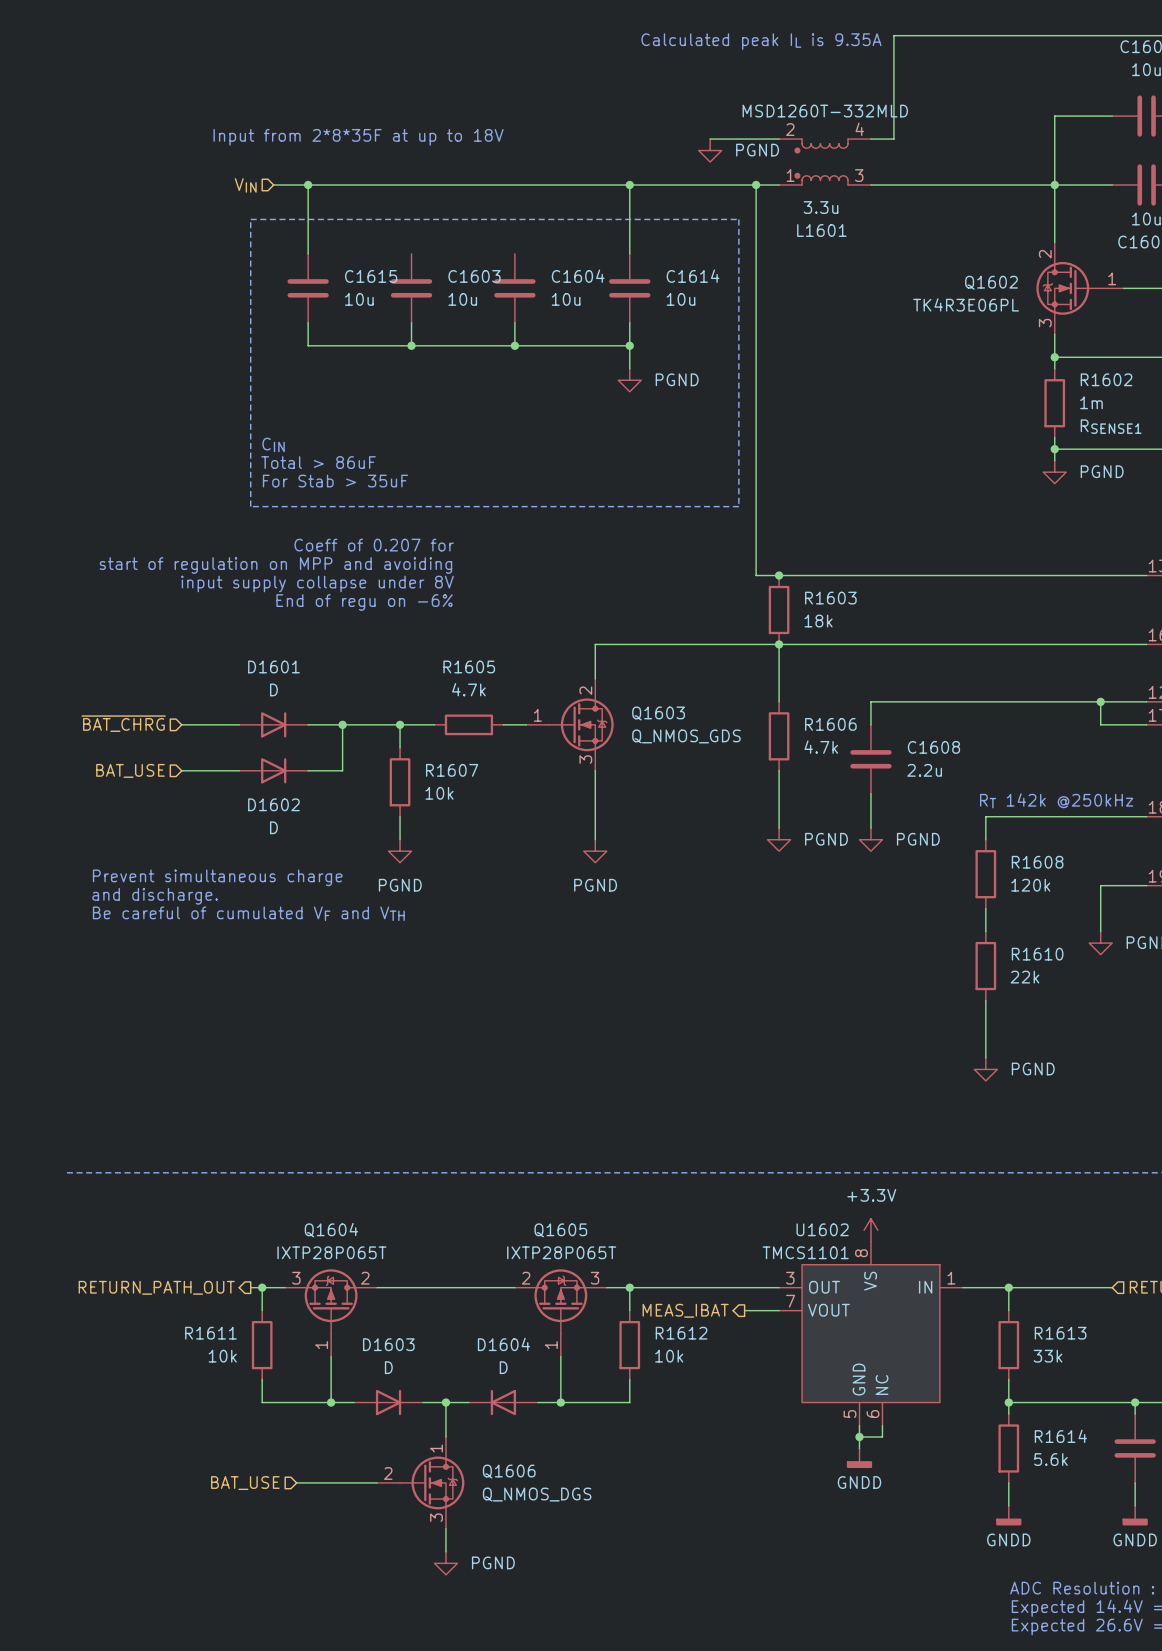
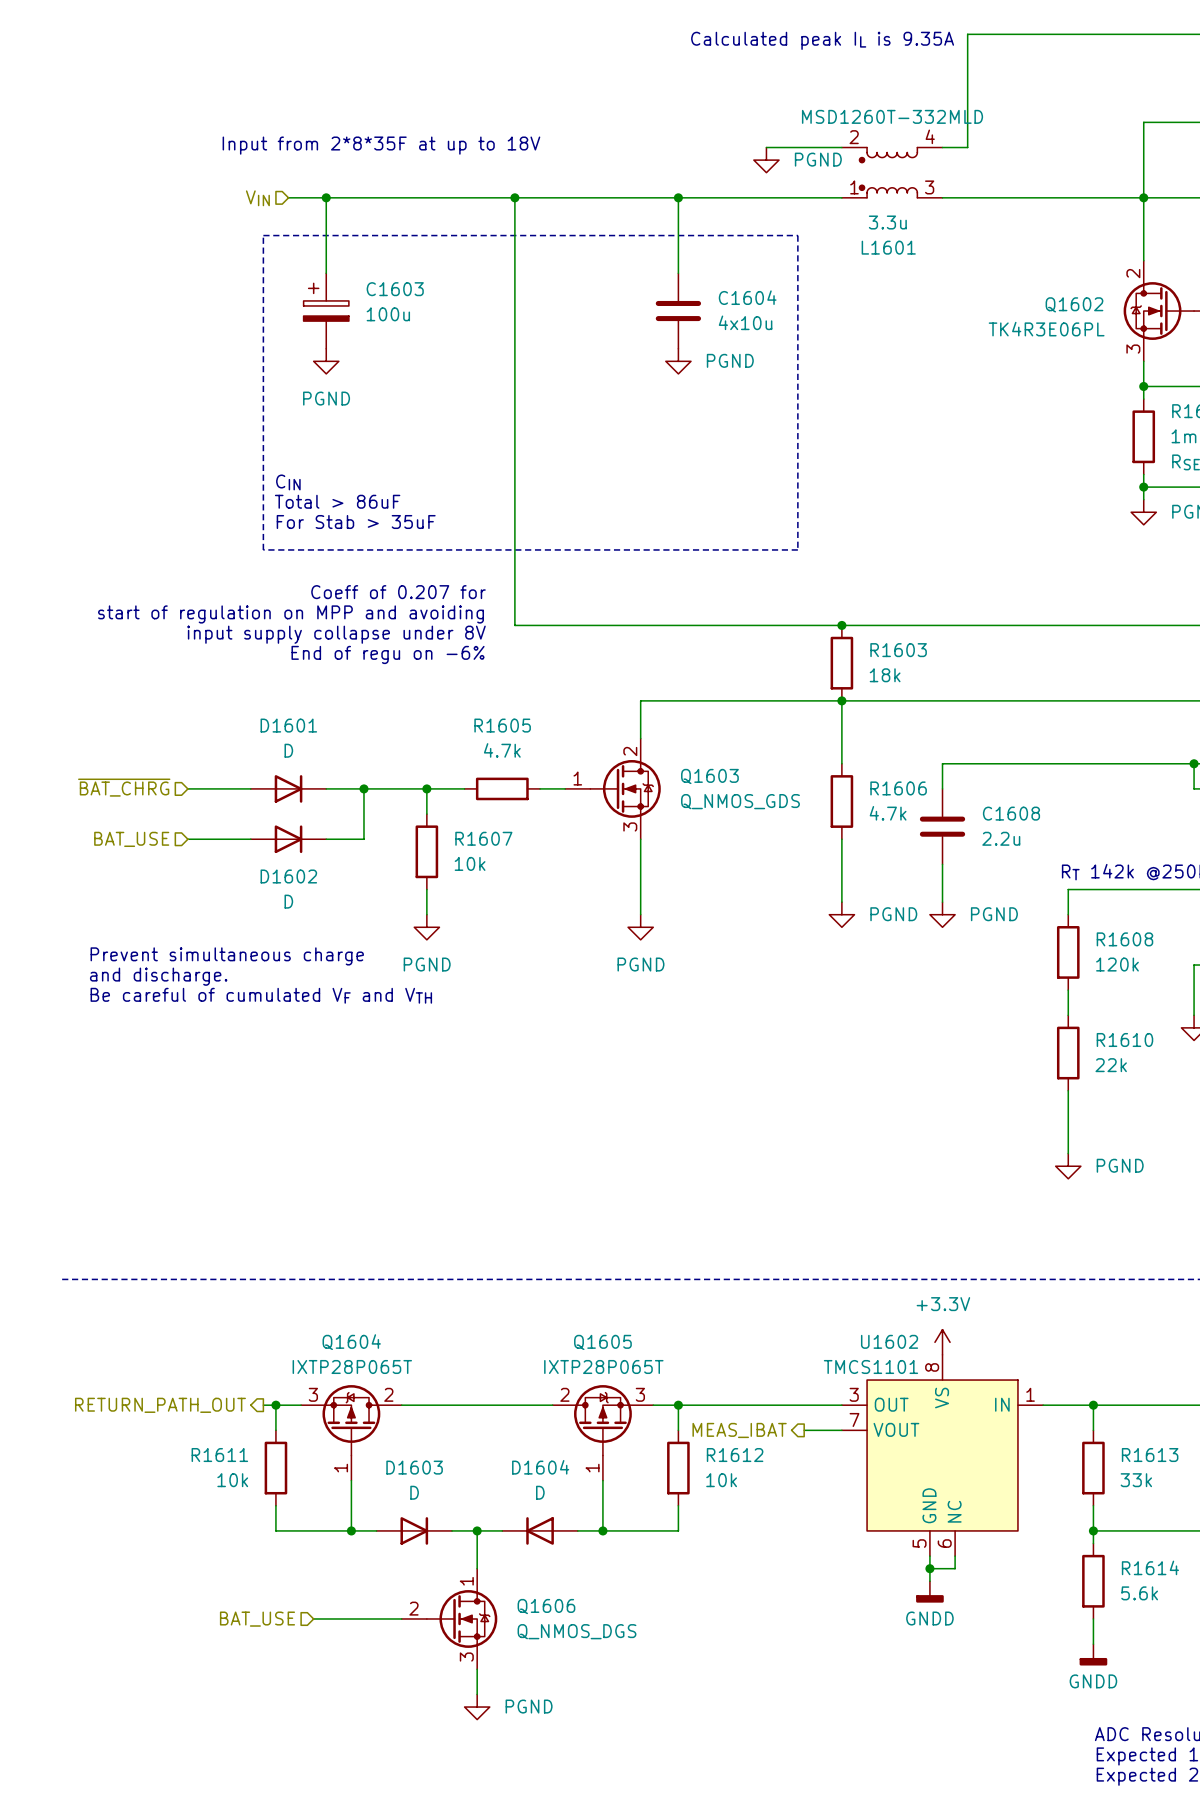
junction: none -> (514, 197)
wire: (756, 184) (756, 575) -> (514, 197) (514, 625) (816, 625)
junction: (756, 184) -> none
C1603 symbol: [390, 253, 433, 323] -> [303, 273, 349, 349]
C1614 name: C1614 (693, 276) -> C1604 (747, 297)
C1615: 10u (308, 288) -> none
C1604: 10u (514, 288) -> none
C1603 value: 10u (462, 299) -> 100u (388, 314)
C1614 value: 10u (680, 299) -> 4x10u (745, 322)
wire: (308, 322) (308, 345) (629, 345) -> none
wire: (411, 322) (411, 345) -> none
wire: (514, 322) (514, 345) -> none
wire: (629, 322) (629, 368) -> none
power symbol: none -> PGND (326, 361)
junction: (411, 345) -> none
junction: (514, 345) -> none
junction: (629, 345) -> none
power symbol position: PGND (629, 380) -> PGND (678, 361)

